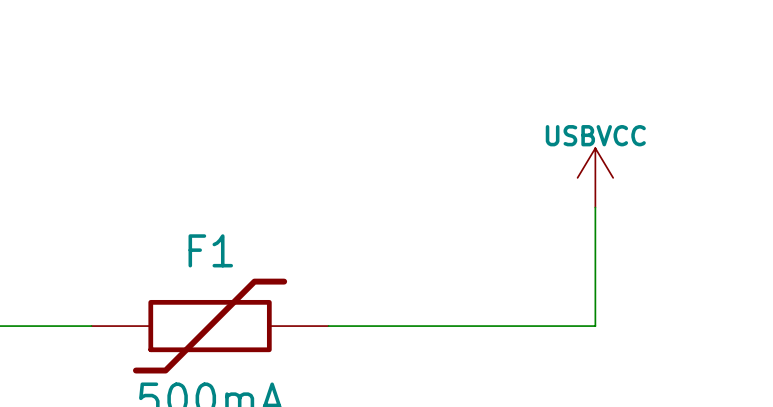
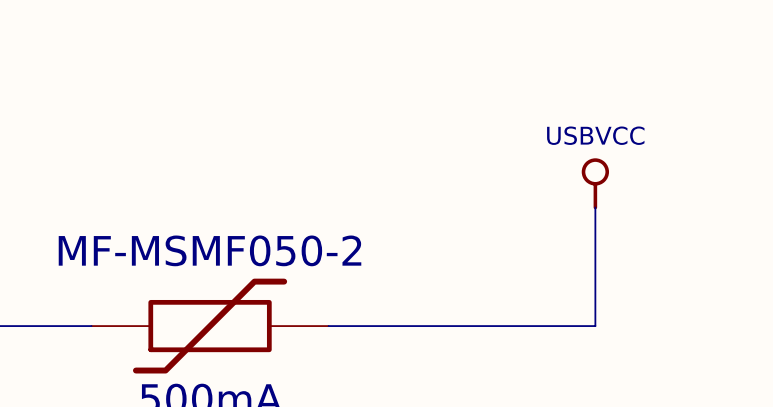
power symbol shape: [577, 148, 614, 208] -> [581, 158, 610, 210]
F1 name: F1 (210, 250) -> MF-MSMF050-2 (210, 250)

